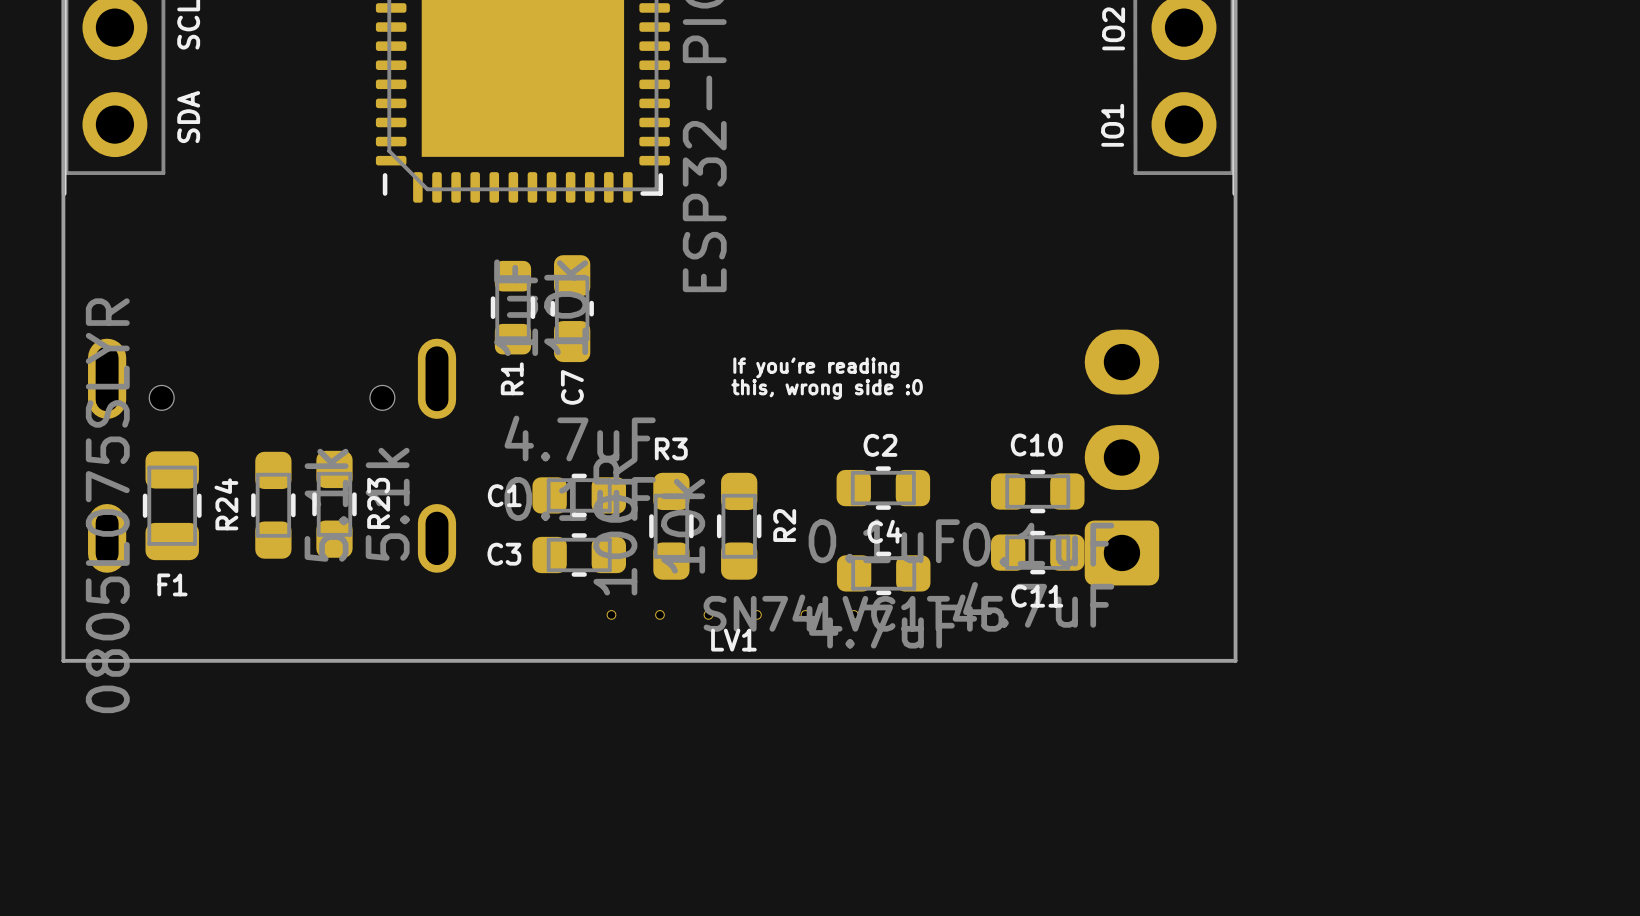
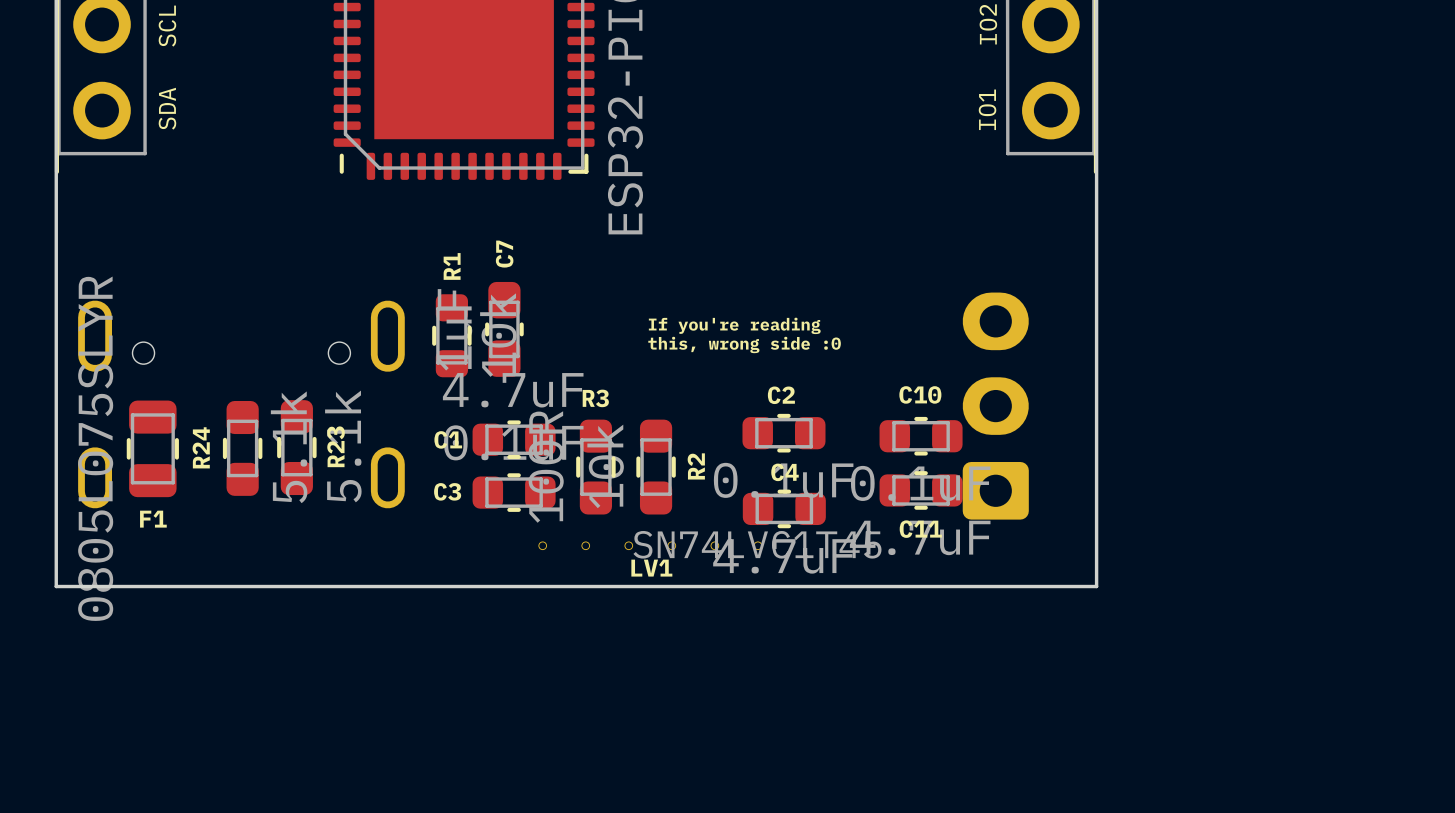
R1 position: (512, 307) -> (451, 335)
C7 position: (572, 308) -> (504, 329)
R1 name position: R1 (512, 378) -> R1 (452, 266)
C7 name position: C7 (572, 387) -> C7 (504, 254)

